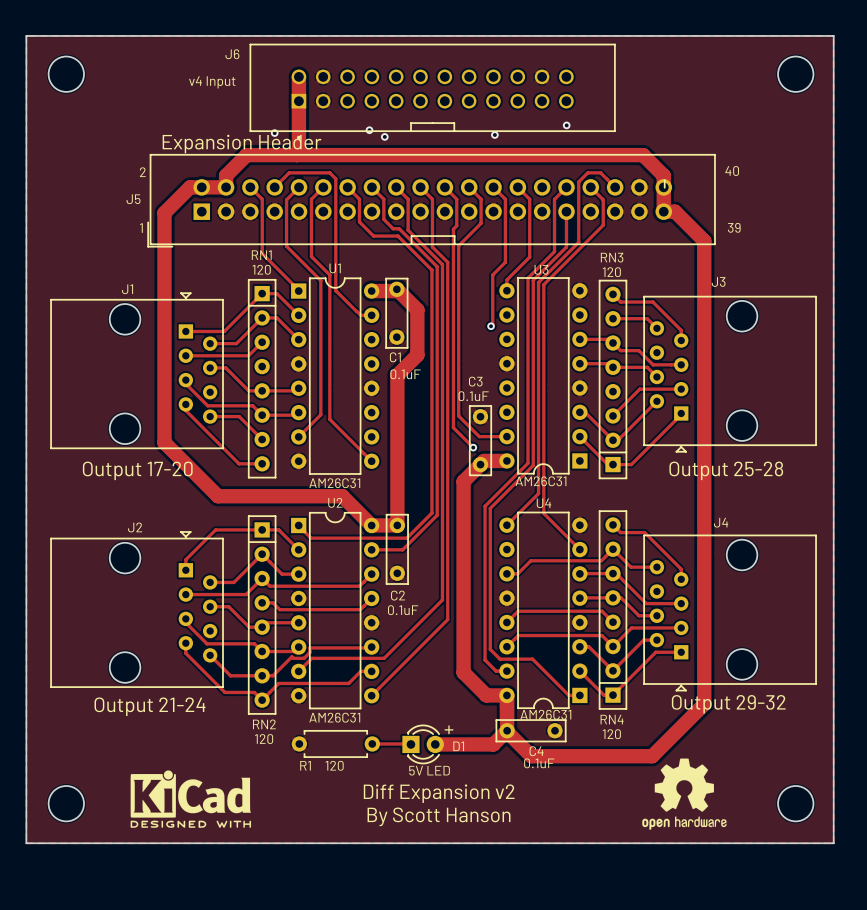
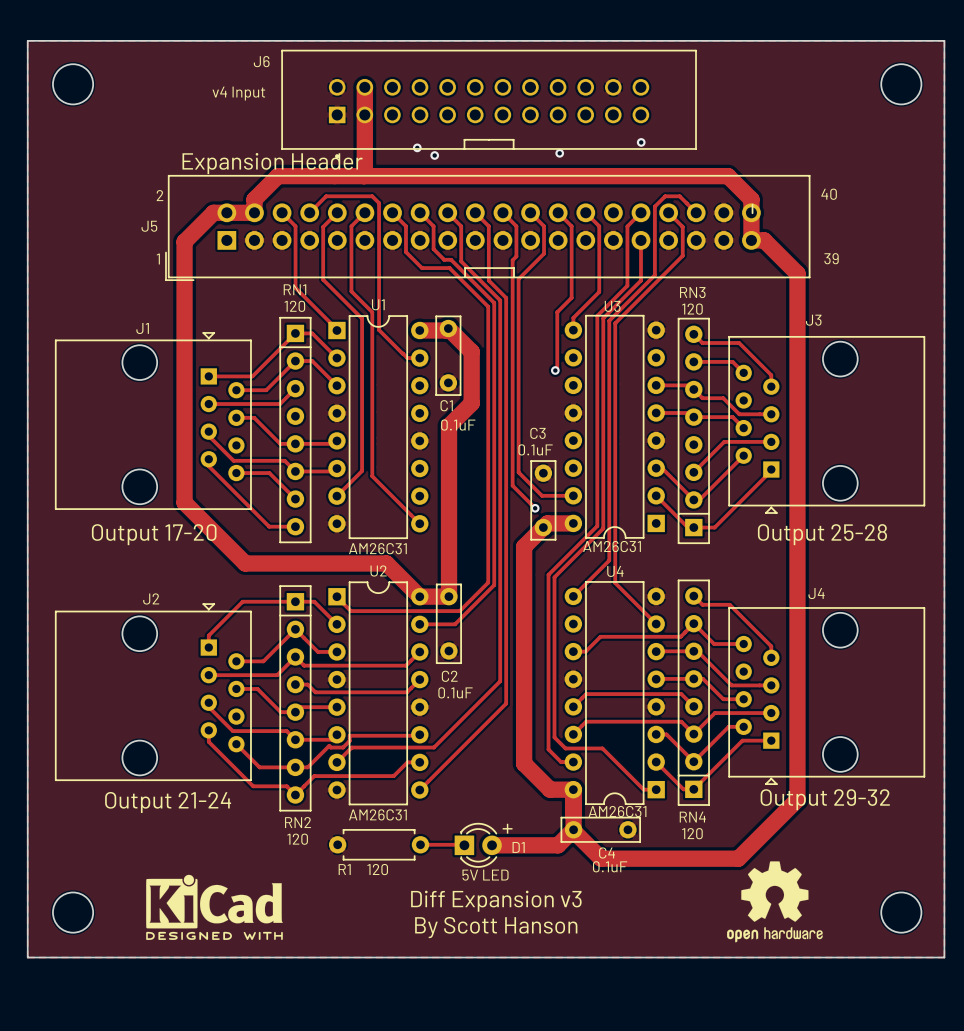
track: (298, 76) (298, 152) (296, 155) -> none
track: none -> (364, 87) (364, 176)
via: (274, 133) -> none
text: Diff Expansion v2 (439, 793) -> Diff Expansion v3 (496, 901)

